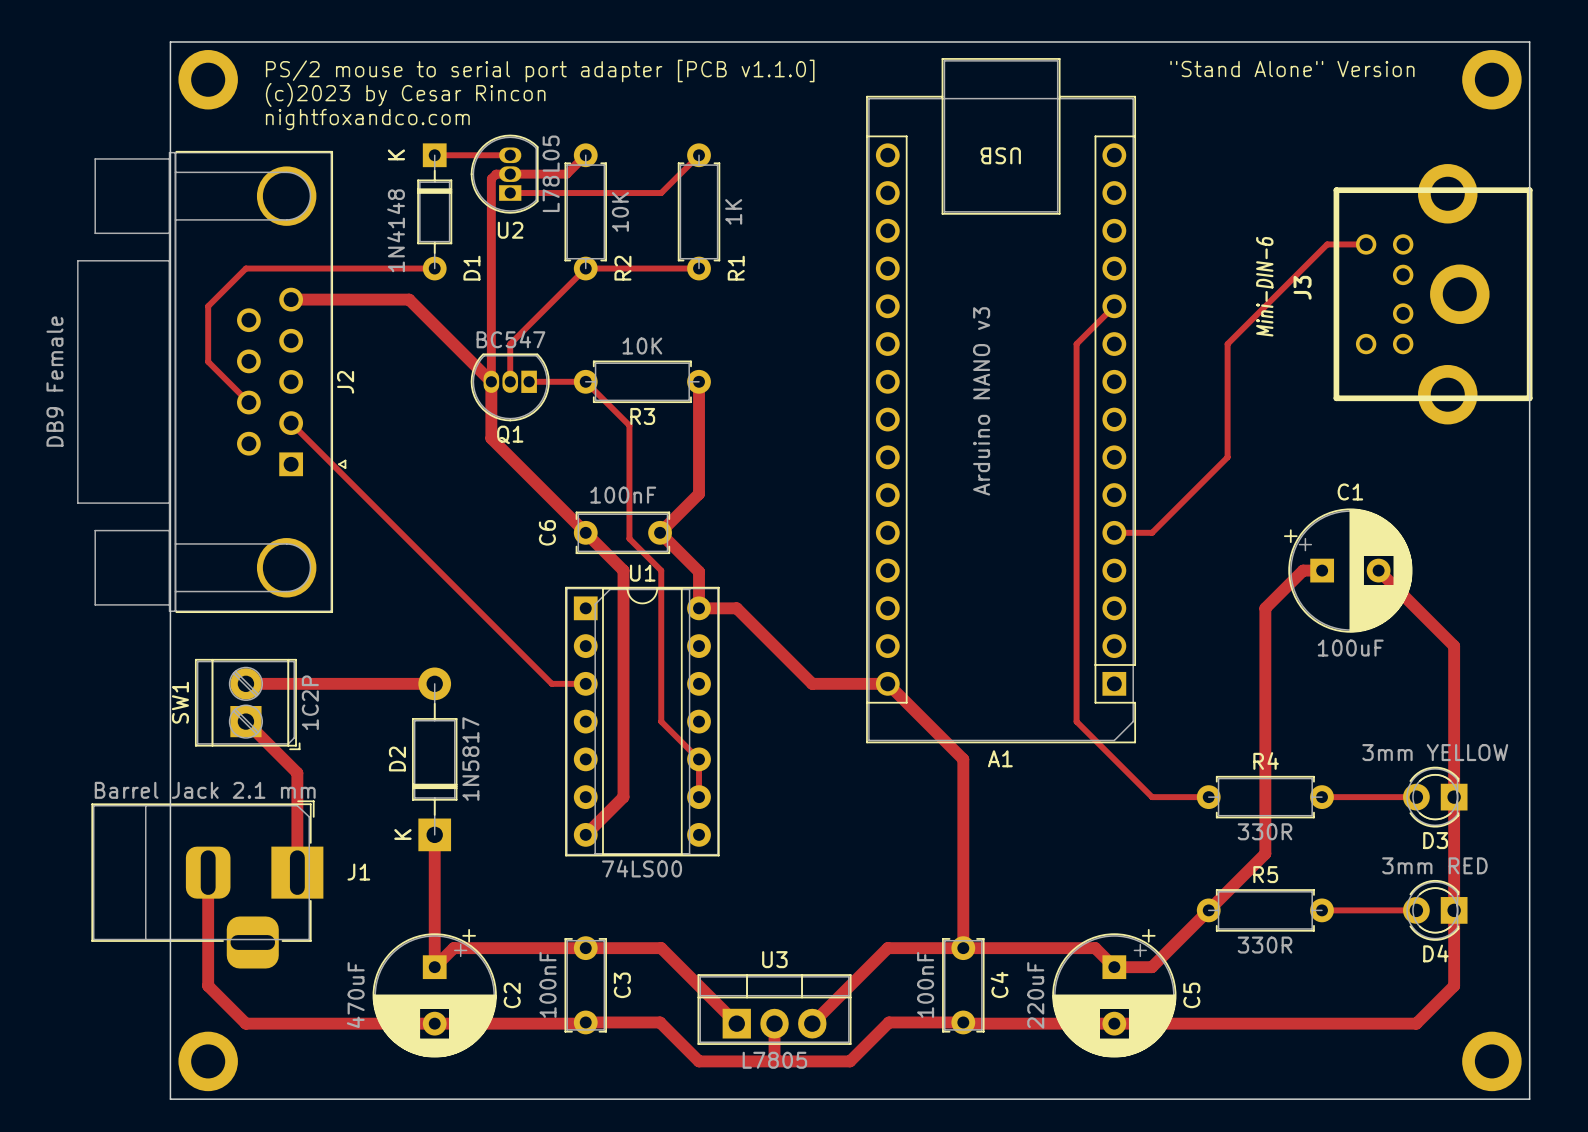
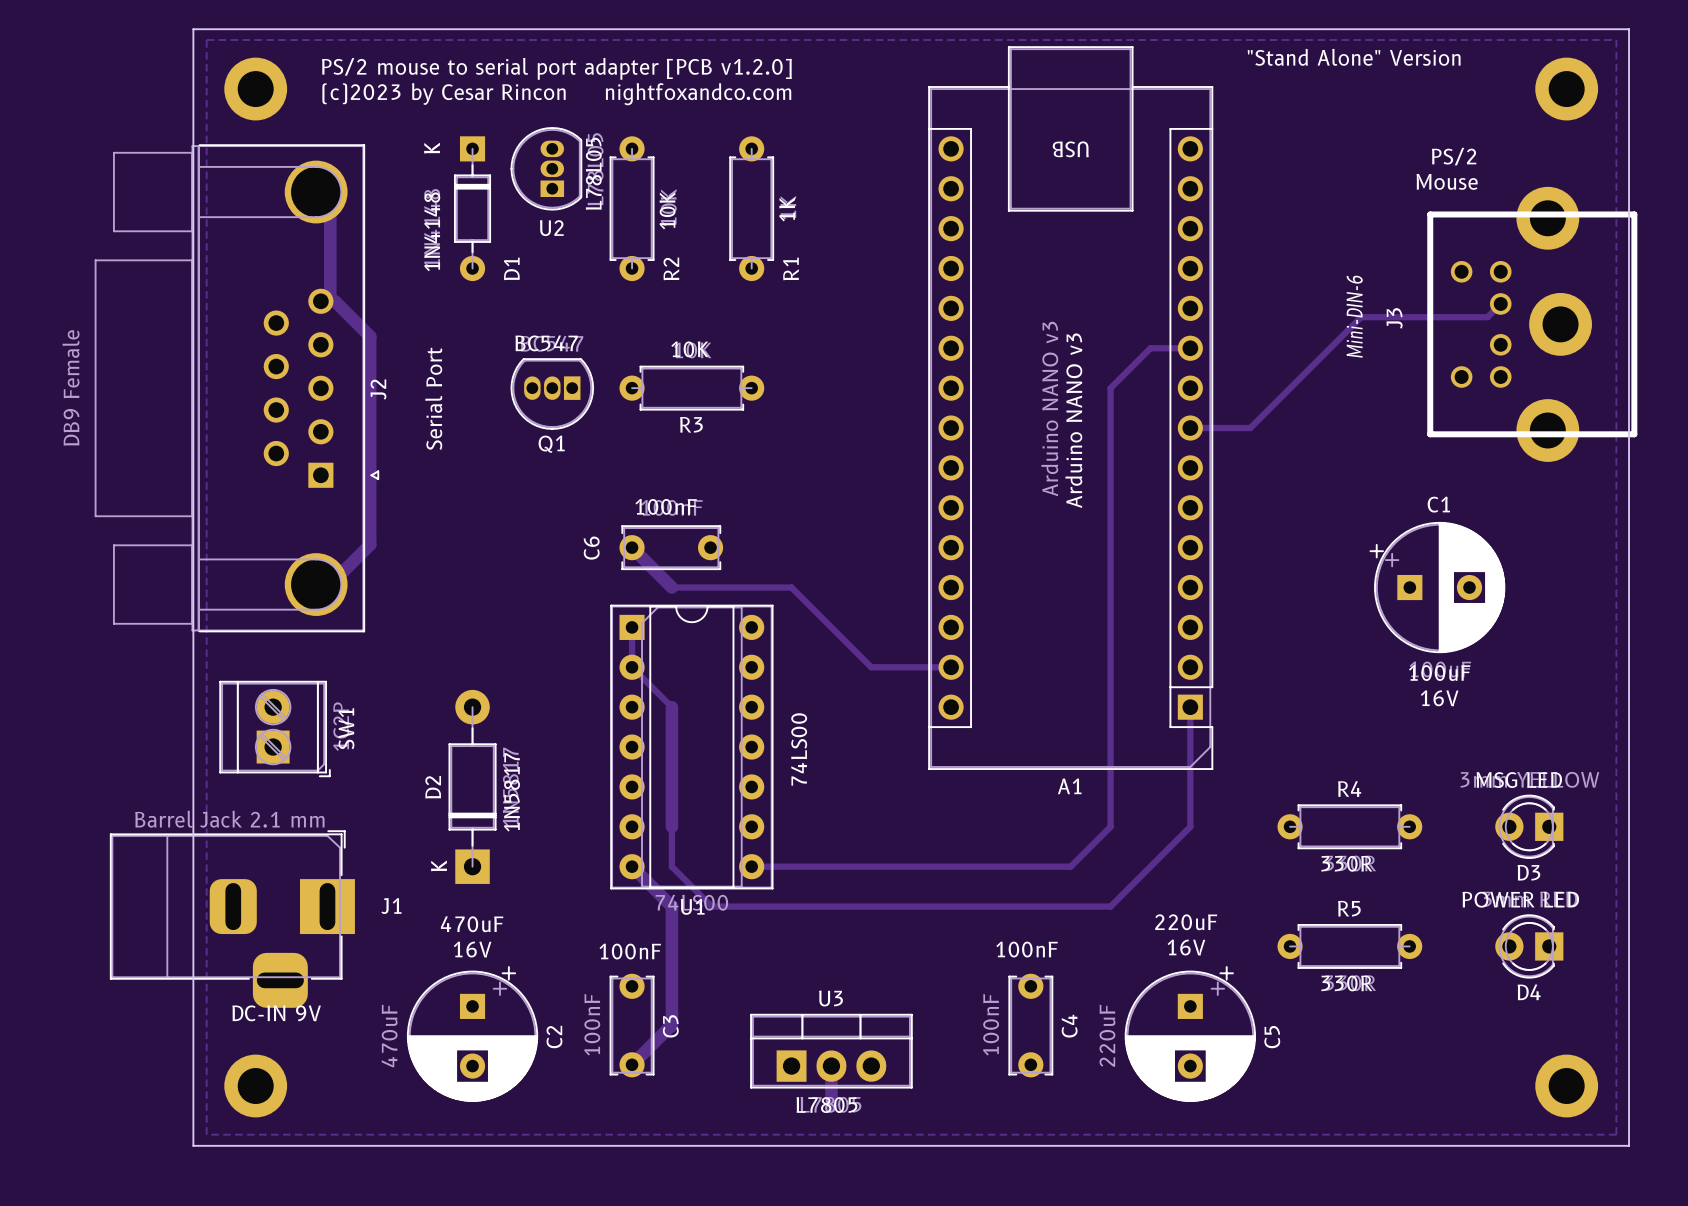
zone outline: none -> (206, 40) (1616, 40) (1616, 1134) (206, 1134) (206, 40)
text: PS/2 mouse to serial port adapter [PCB v1.1.0] (540, 70) -> PS/2 mouse to serial port adapter [PCB v1.2.0] (556, 68)
part position: (208, 79) -> (255, 89)
part position: (1491, 79) -> (1566, 89)
text: (c)2023 by Cesar Rincon (405, 94) -> (c)2023 by Cesar Rincon nightfoxandco.com (556, 94)
text: nightfoxandco.com (367, 119) -> none
track: (434, 155) (510, 155) -> none
track: (585, 155) (566, 174) (496, 174) (491, 178) (491, 381) -> none
track: (699, 155) (661, 193) (510, 193) -> none
text: none -> PS/2 (1454, 156)
text: none -> L78L05 (593, 173)
text: none -> Mouse (1447, 181)
track: none -> (330, 192) (330, 296)
text: none -> 10K (667, 210)
text: none -> 1K (787, 209)
text: none -> 1N4148 (432, 231)
track: (1366, 244) (1327, 244) (1227, 344) (1227, 457) (1152, 532) (1114, 532) -> none
track: (434, 268) (245, 268) (208, 306) (208, 361) (248, 402) -> none
track: (699, 268) (585, 268) (510, 344) (510, 381) -> none
J3 position: (1433, 294) -> (1532, 324)
track: (291, 299) (409, 299) (491, 381) -> none
track: none -> (335, 301) (370, 336) (370, 544) (330, 584)
track: none -> (1500, 303) (1487, 317) (1361, 317) (1250, 428) (1190, 428)
track: (1114, 306) (1076, 344) (1076, 721) (1152, 797) (1208, 797) -> none
text: none -> BC547 (546, 343)
track: none -> (1190, 348) (1150, 348) (1110, 388) (1110, 826) (1070, 866) (751, 866)
text: none -> 10K (689, 349)
text: none -> Serial Port (433, 398)
track: (491, 381) (491, 438) (585, 532) -> none
track: (529, 381) (585, 381) (629, 425) (629, 538) (661, 570) (661, 721) (699, 759) (699, 797) -> none
track: (699, 381) (699, 493) (660, 532) (699, 571) (699, 608) (736, 608) (812, 683) (887, 683) (963, 759) (963, 948) -> none
text: none -> Arduino NANO v3 (1073, 420)
track: (291, 423) (551, 683) (585, 683) -> none
text: none -> 100nF (666, 506)
track: (623, 570) (623, 683) -> (632, 627) (632, 667) (671, 707)
track: none -> (671, 587) (791, 587) (871, 667) (951, 667)
track: (1322, 570) (1303, 570) (1265, 608) (1265, 853) (1151, 967) (1114, 967) (1095, 948) (887, 948) (812, 1023) -> none
track: (1378, 570) (1454, 646) (1454, 985) (1416, 1023) (888, 1022) (850, 1061) (699, 1061) (660, 1022) (245, 1023) (208, 985) (208, 872) -> none
U1 name position: U1 (642, 573) -> U1 (692, 906)
text: none -> 100uF (1439, 673)
text: none -> 16V (1439, 698)
track: (245, 683) (434, 683) -> none
track: none -> (1190, 707) (1190, 826) (1110, 906) (711, 906) (671, 866) (671, 826)
SW1 name position: SW1 (180, 702) -> SW1 (346, 728)
text: none -> 74LS00 (799, 749)
track: (245, 721) (297, 773) (297, 872) -> none
text: none -> MSG LED (1519, 780)
text: none -> 1N5817 (512, 792)
track: (623, 797) (585, 834) -> (632, 1064) (671, 1026) (671, 906) (632, 866)
track: (1321, 797) (1416, 797) -> none
text: none -> 330R (1346, 863)
track: (434, 834) (434, 967) (453, 948) (661, 948) (736, 1023) -> none
text: none -> POWER LED (1520, 899)
text: none -> 220uF (1186, 922)
text: none -> 470uF (472, 924)
track: (1321, 910) (1416, 910) -> none
text: none -> 16V (1186, 947)
text: none -> 16V (472, 949)
text: none -> 100nF (1027, 949)
text: none -> 100nF (630, 951)
text: none -> 330R (1346, 983)
text: none -> DC-IN 9V (276, 1013)
text: none -> L7805 (826, 1105)
part position: (208, 1061) -> (255, 1086)
part position: (1491, 1061) -> (1566, 1086)

